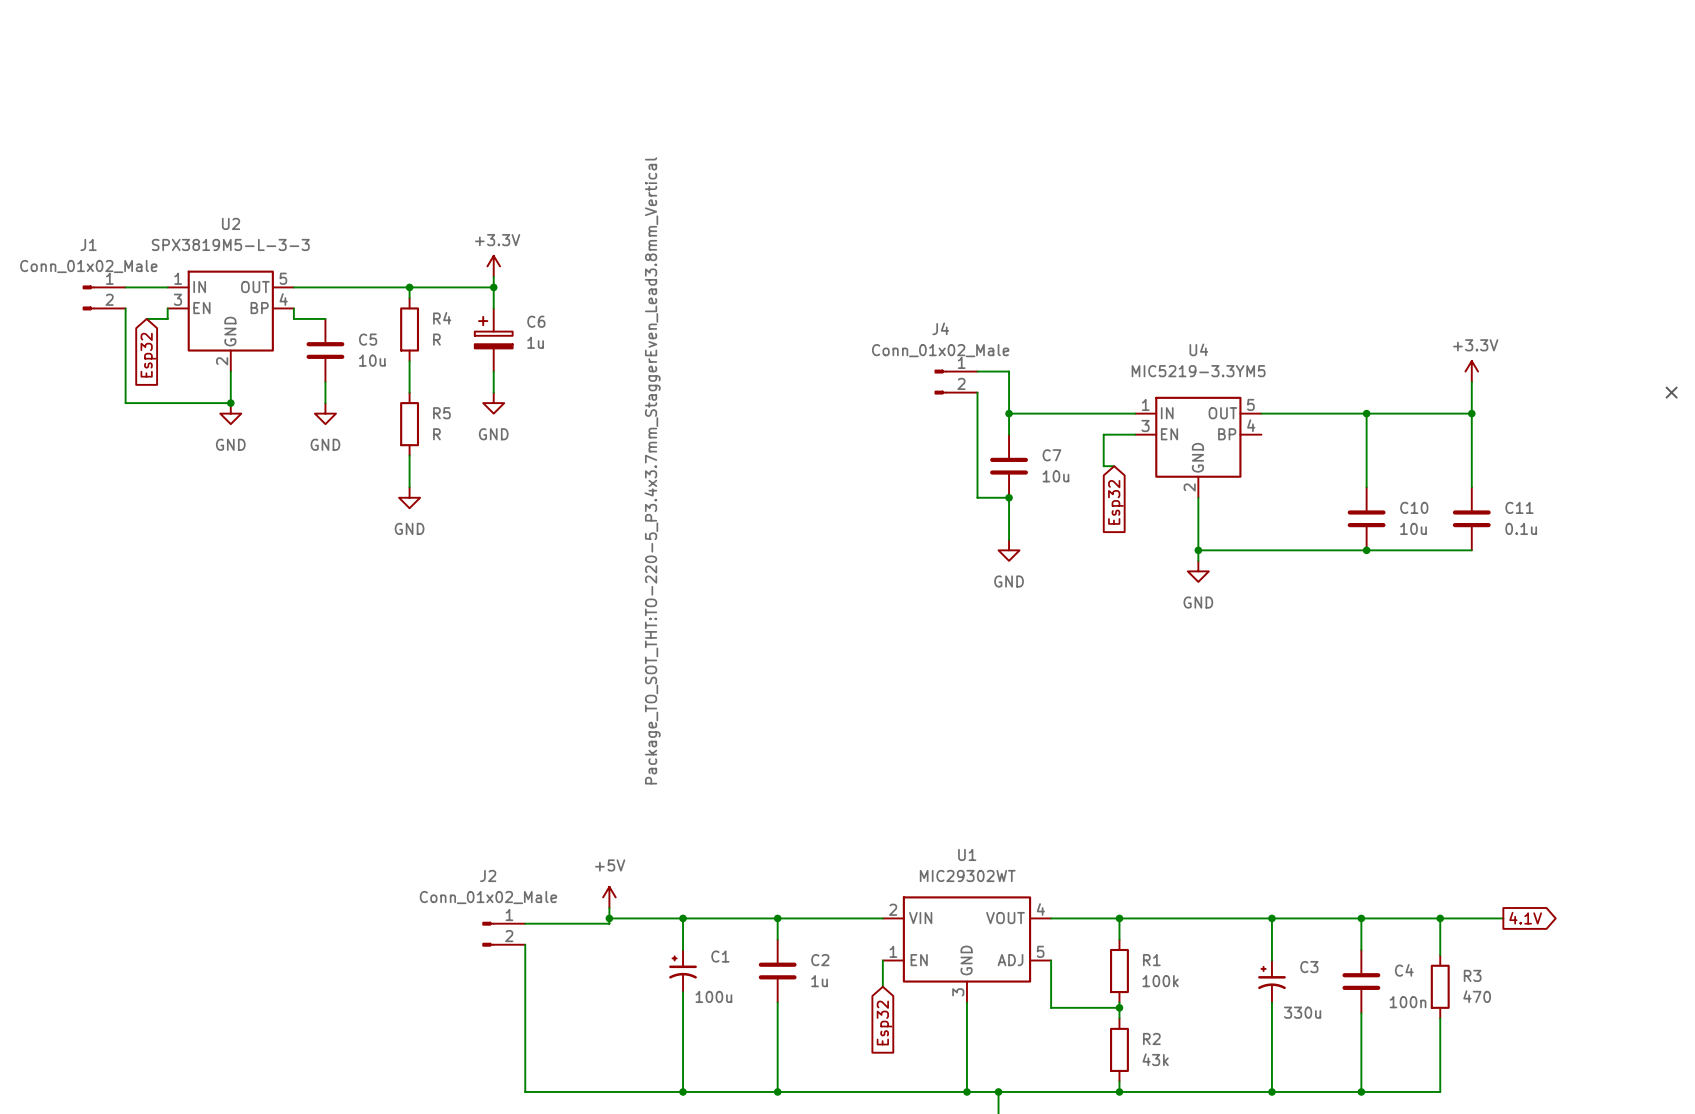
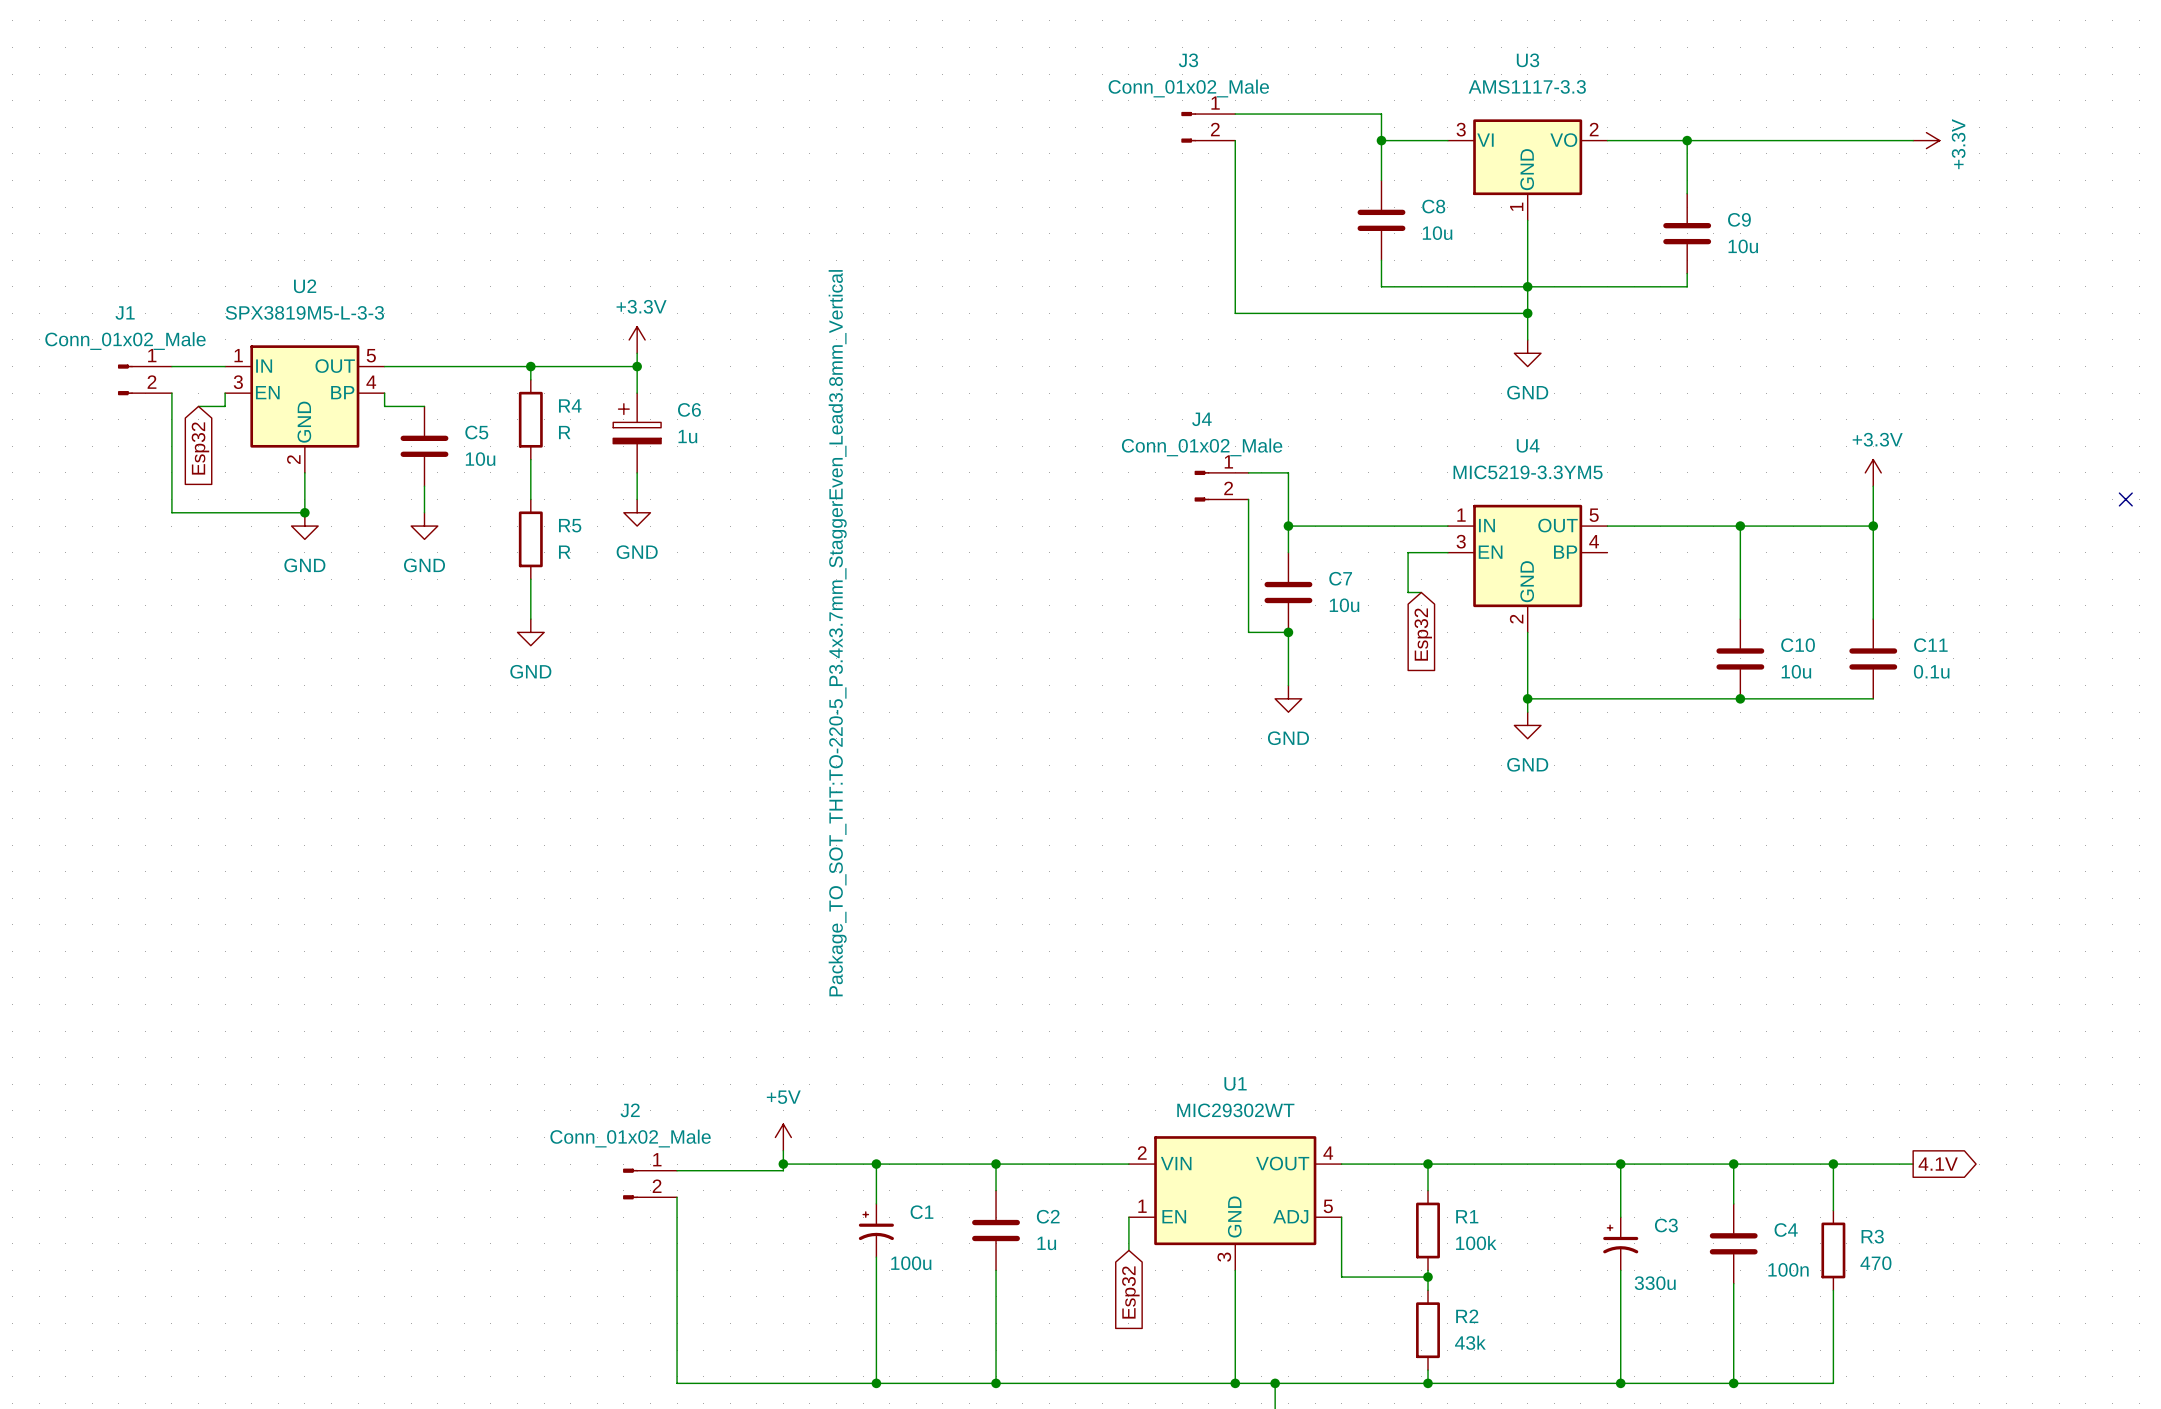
wire: none -> (1235, 114) (1381, 114) (1381, 180)
J3: none -> Conn_01x02_Male (1208, 127)
wire: none -> (1235, 140) (1235, 313) (1527, 313)
wire: none -> (1381, 140) (1447, 140)
junction: none -> (1381, 140)
wire: none -> (1607, 140) (1913, 140)
wire: none -> (1687, 140) (1687, 193)
junction: none -> (1687, 140)
power symbol: none -> +3.3V (1926, 140)
U3: none -> AMS1117-3.3 (1527, 169)
C8: none -> 10u (1381, 220)
wire: none -> (1527, 220) (1527, 339)
C9: none -> 10u (1687, 233)
wire: none -> (1381, 260) (1381, 286) (1687, 286) (1687, 273)
junction: none -> (1527, 286)
junction: none -> (1527, 313)
power symbol: none -> GND (1527, 353)

